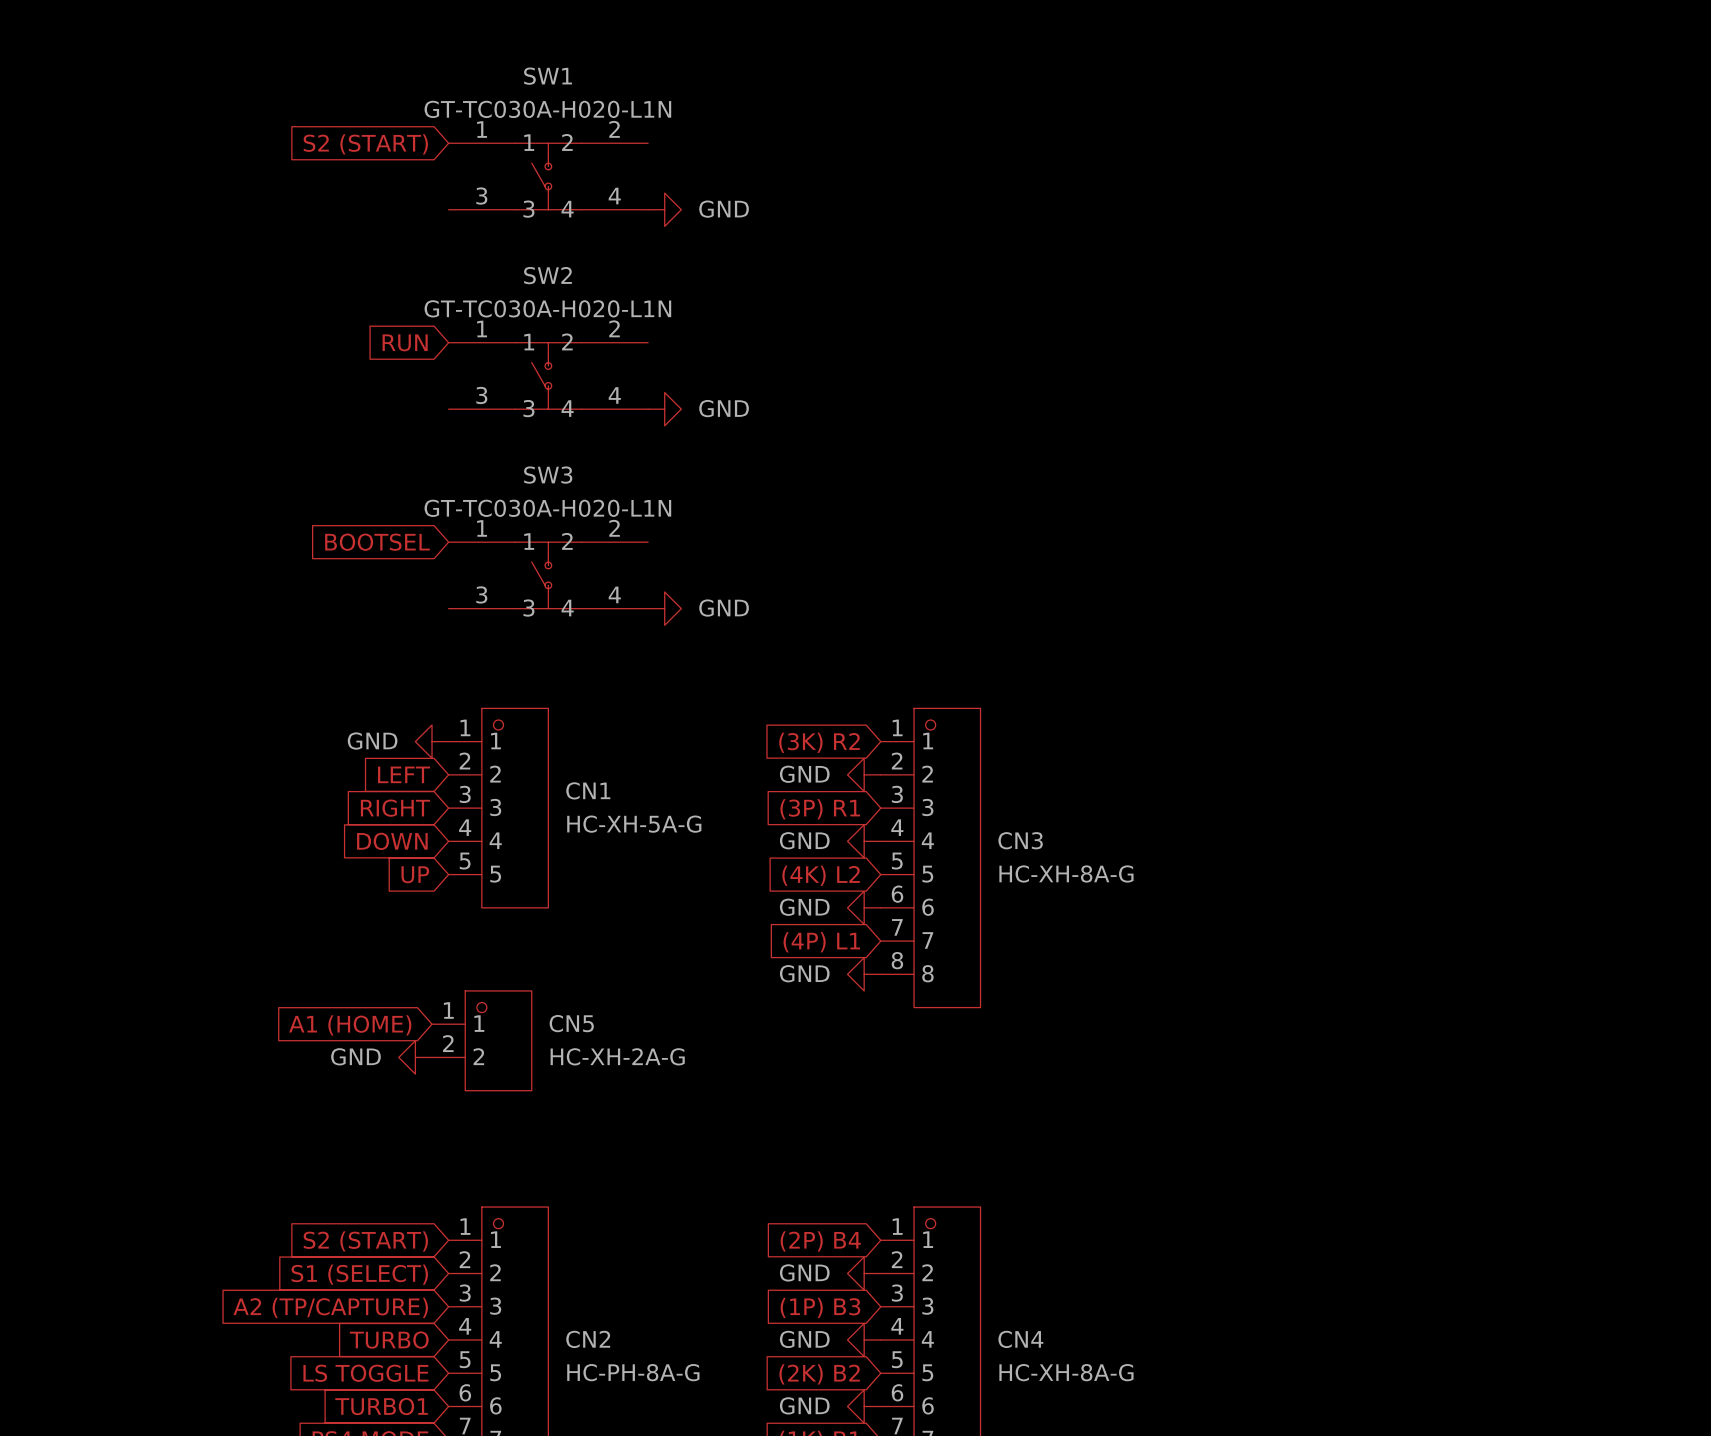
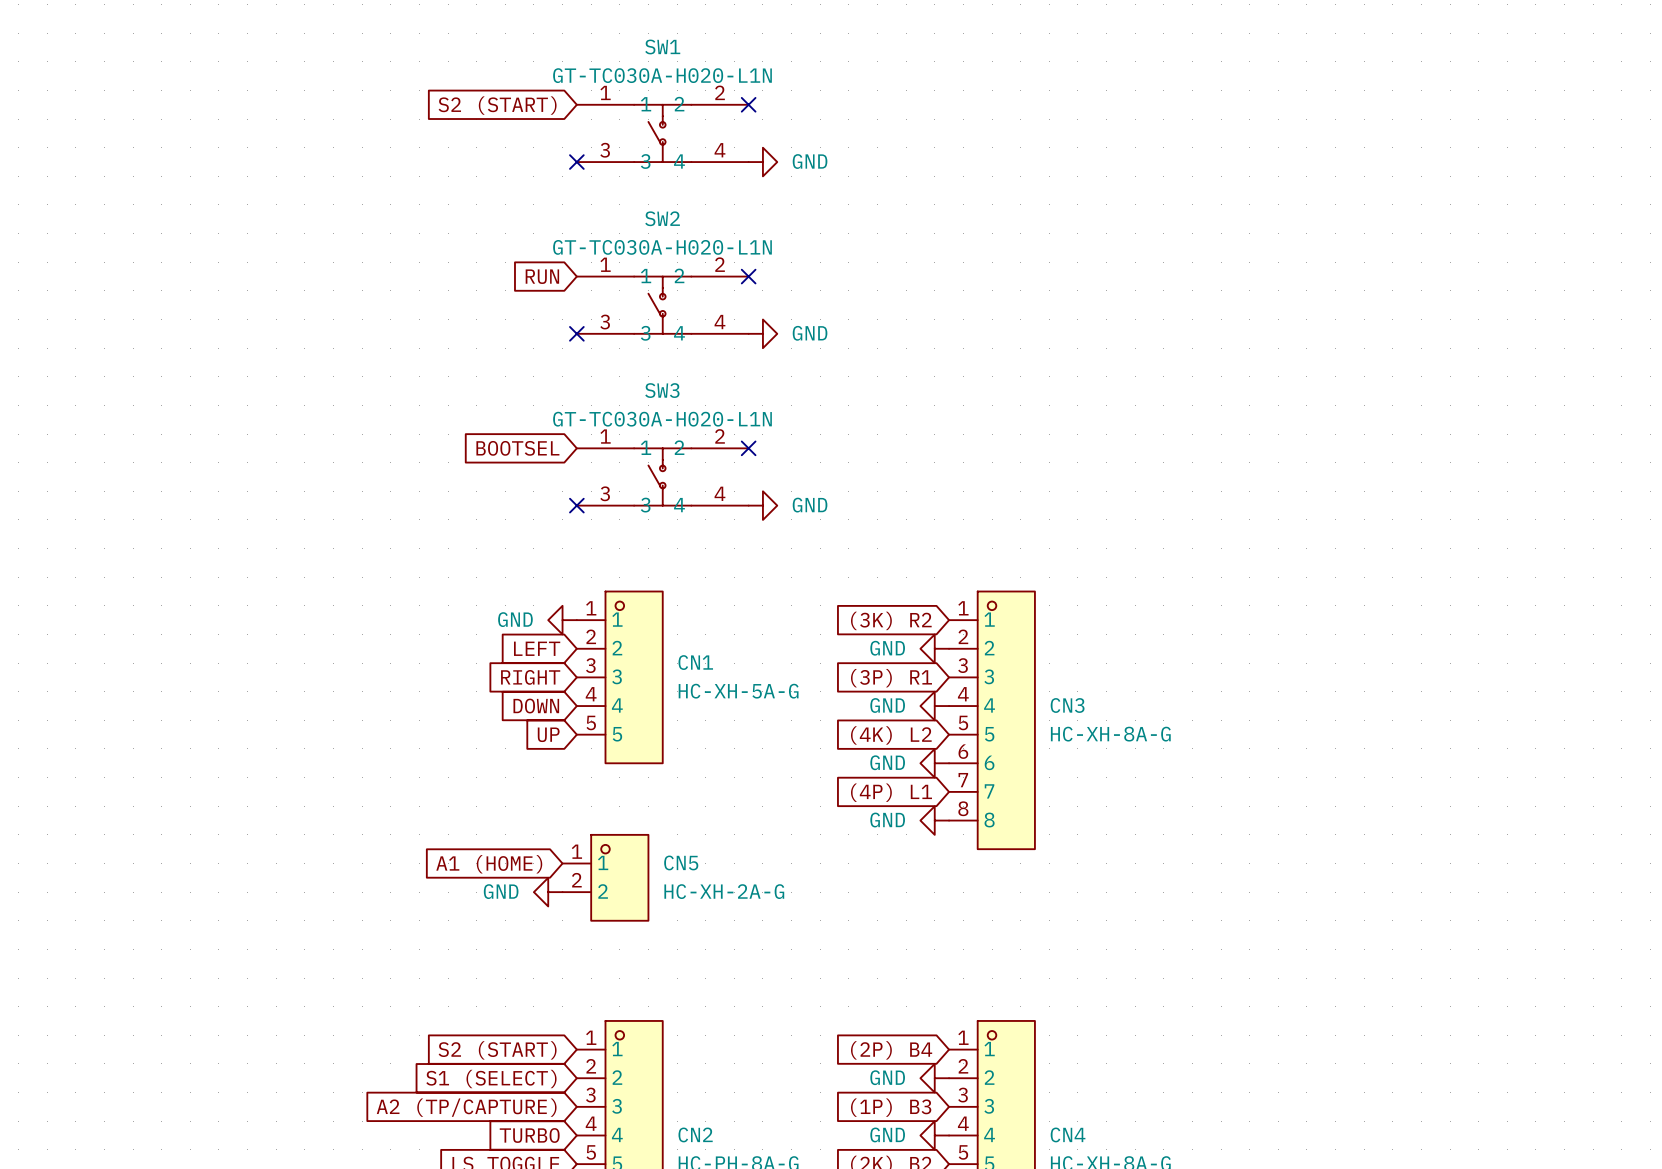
no-connect mark: none -> (748, 104)
no-connect mark: none -> (576, 162)
no-connect mark: none -> (748, 276)
no-connect mark: none -> (576, 333)
no-connect mark: none -> (748, 448)
no-connect mark: none -> (576, 505)

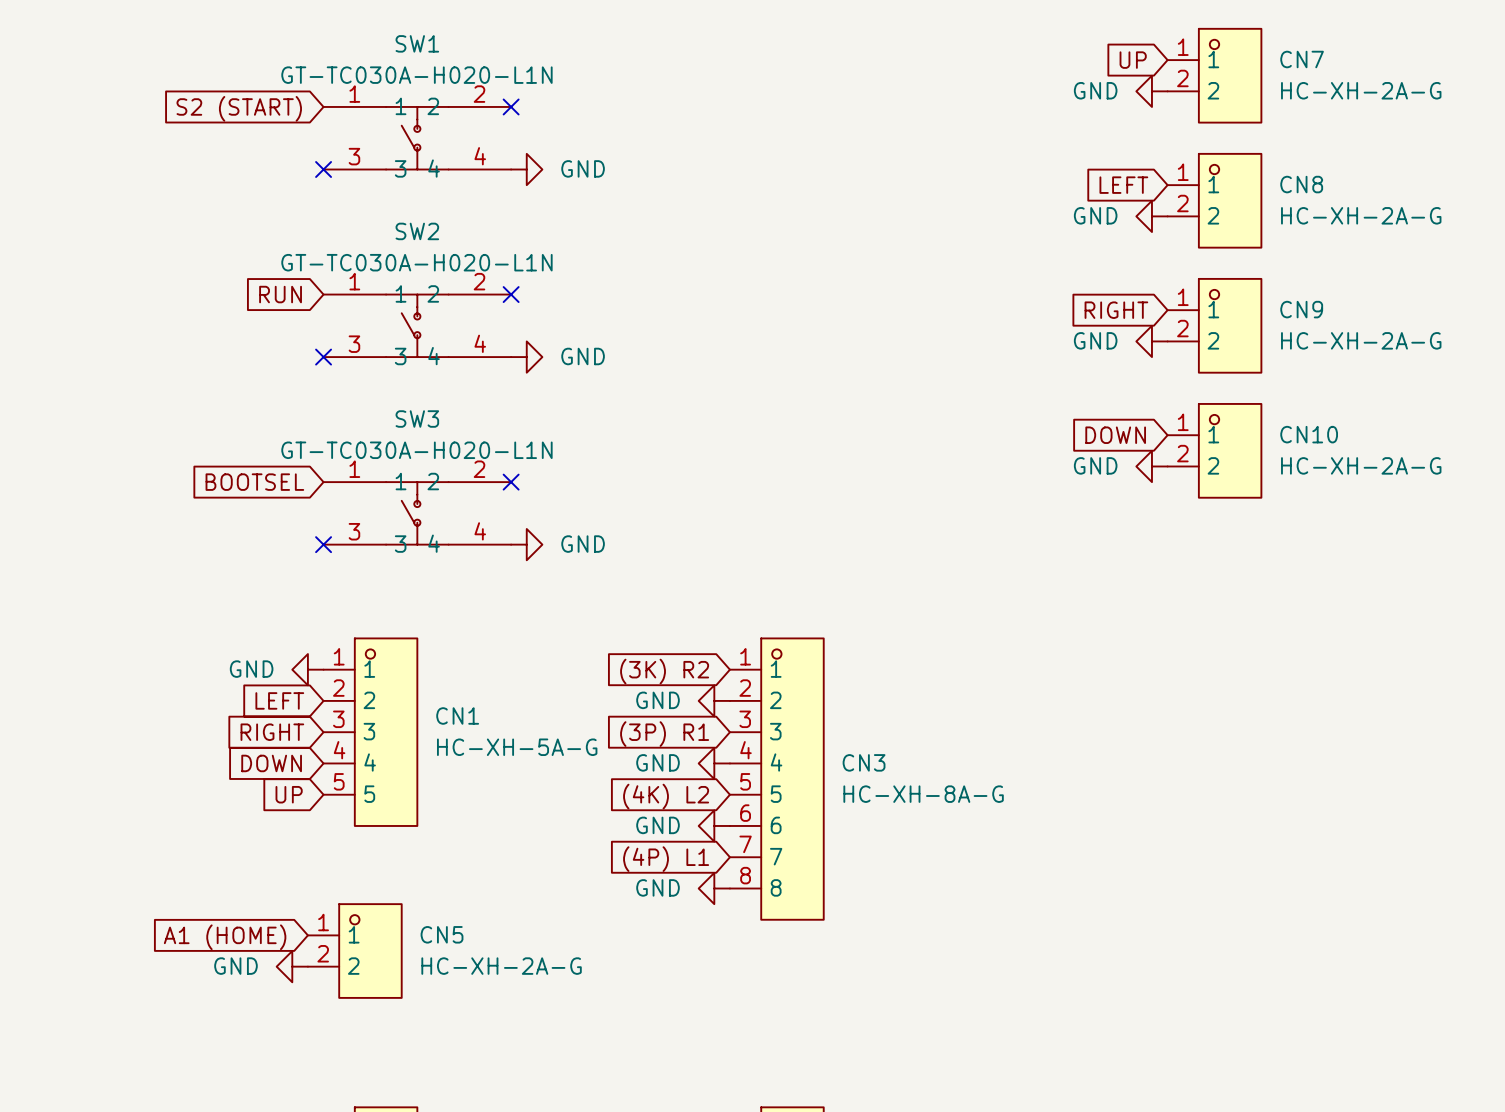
global label: none -> UP (1133, 60)
CN7: none -> HC-XH-2A-G (1214, 75)
power symbol: none -> GND (1151, 91)
global label: none -> LEFT (1123, 185)
CN8: none -> HC-XH-2A-G (1214, 200)
power symbol: none -> GND (1151, 216)
global label: none -> RIGHT (1116, 310)
CN9: none -> HC-XH-2A-G (1214, 325)
power symbol: none -> GND (1151, 341)
global label: none -> DOWN (1115, 435)
CN10: none -> HC-XH-2A-G (1214, 450)
power symbol: none -> GND (1151, 466)

